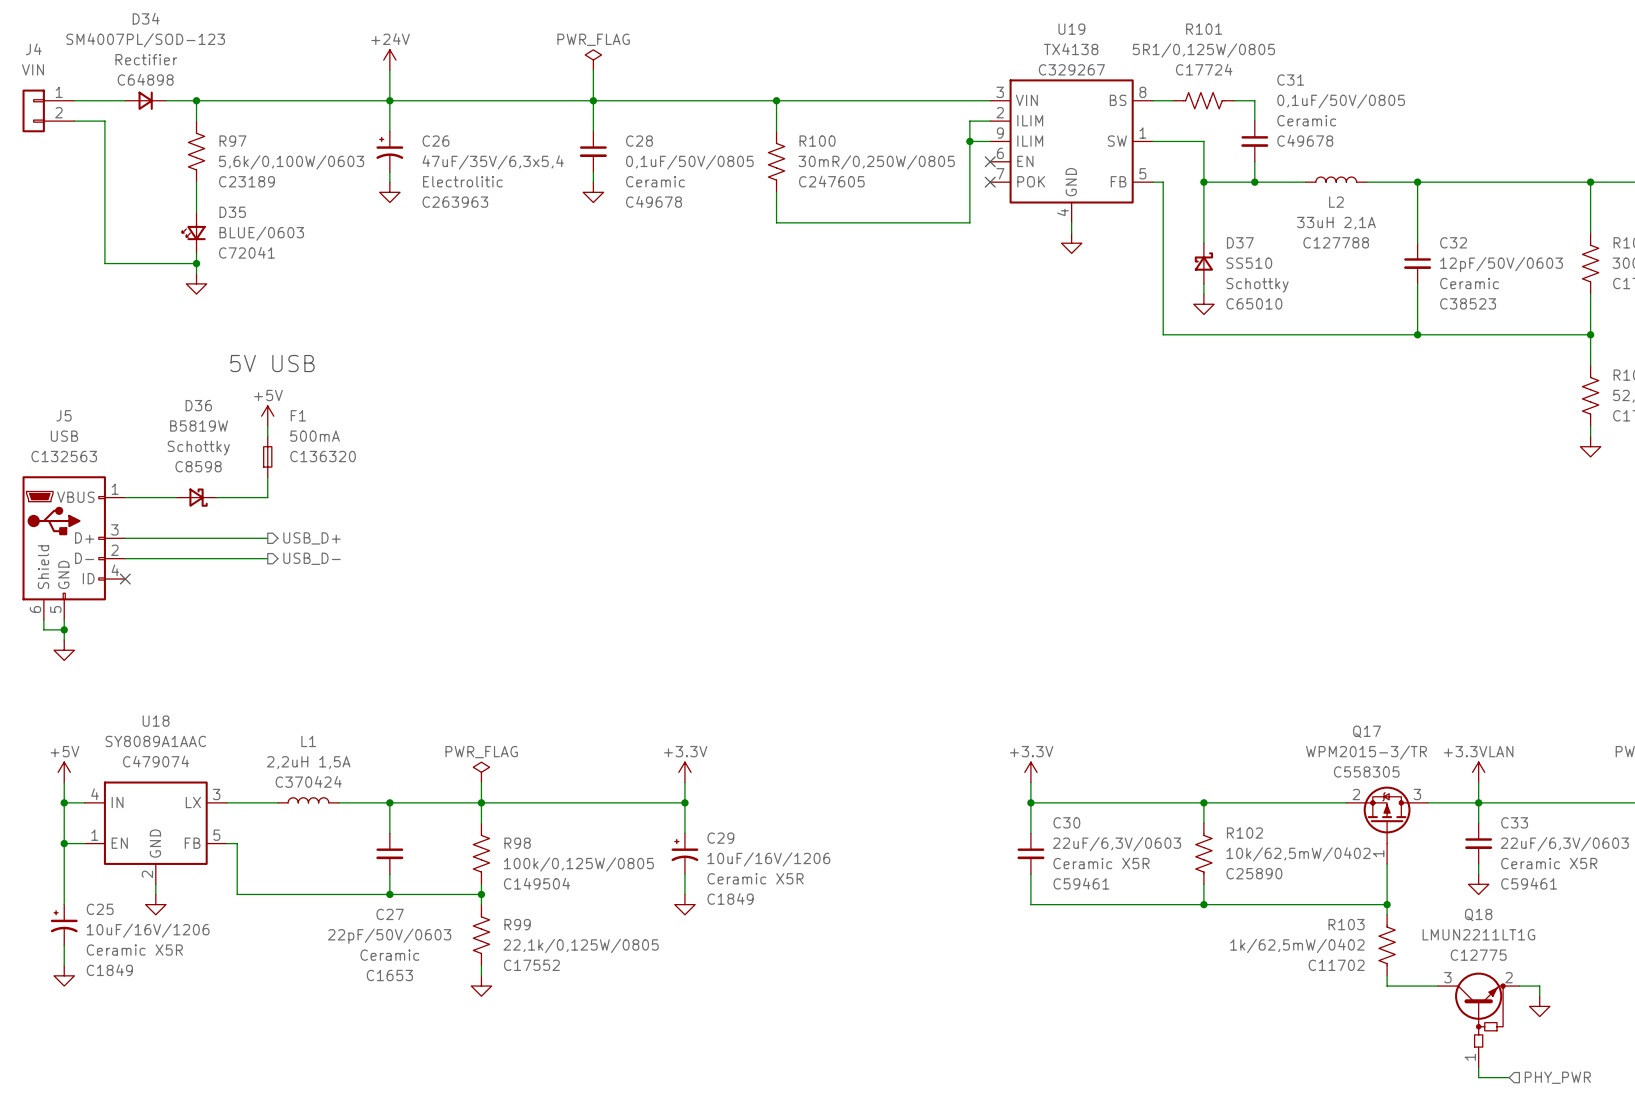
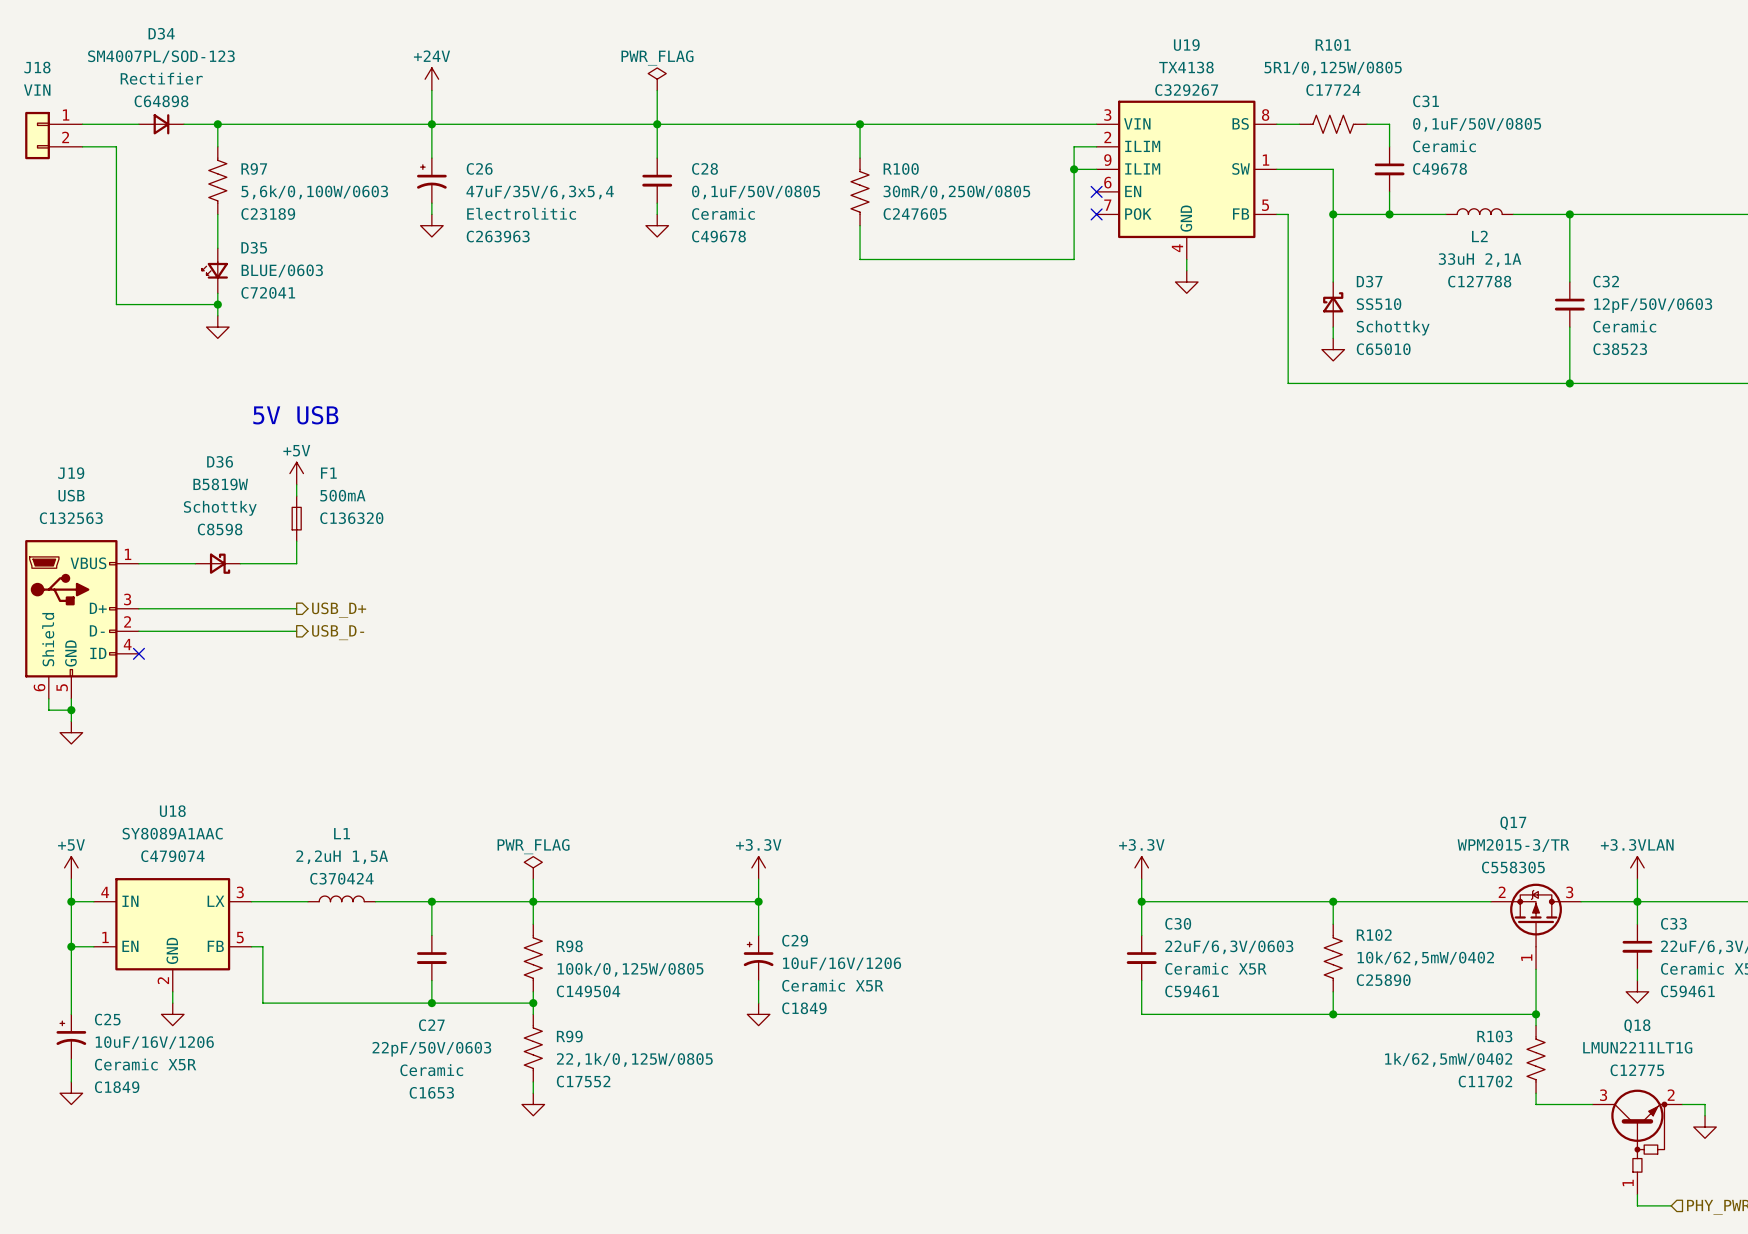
J4 name: J4 (33, 49) -> J18 (37, 67)
J5 name: J5 (63, 415) -> J19 (71, 473)

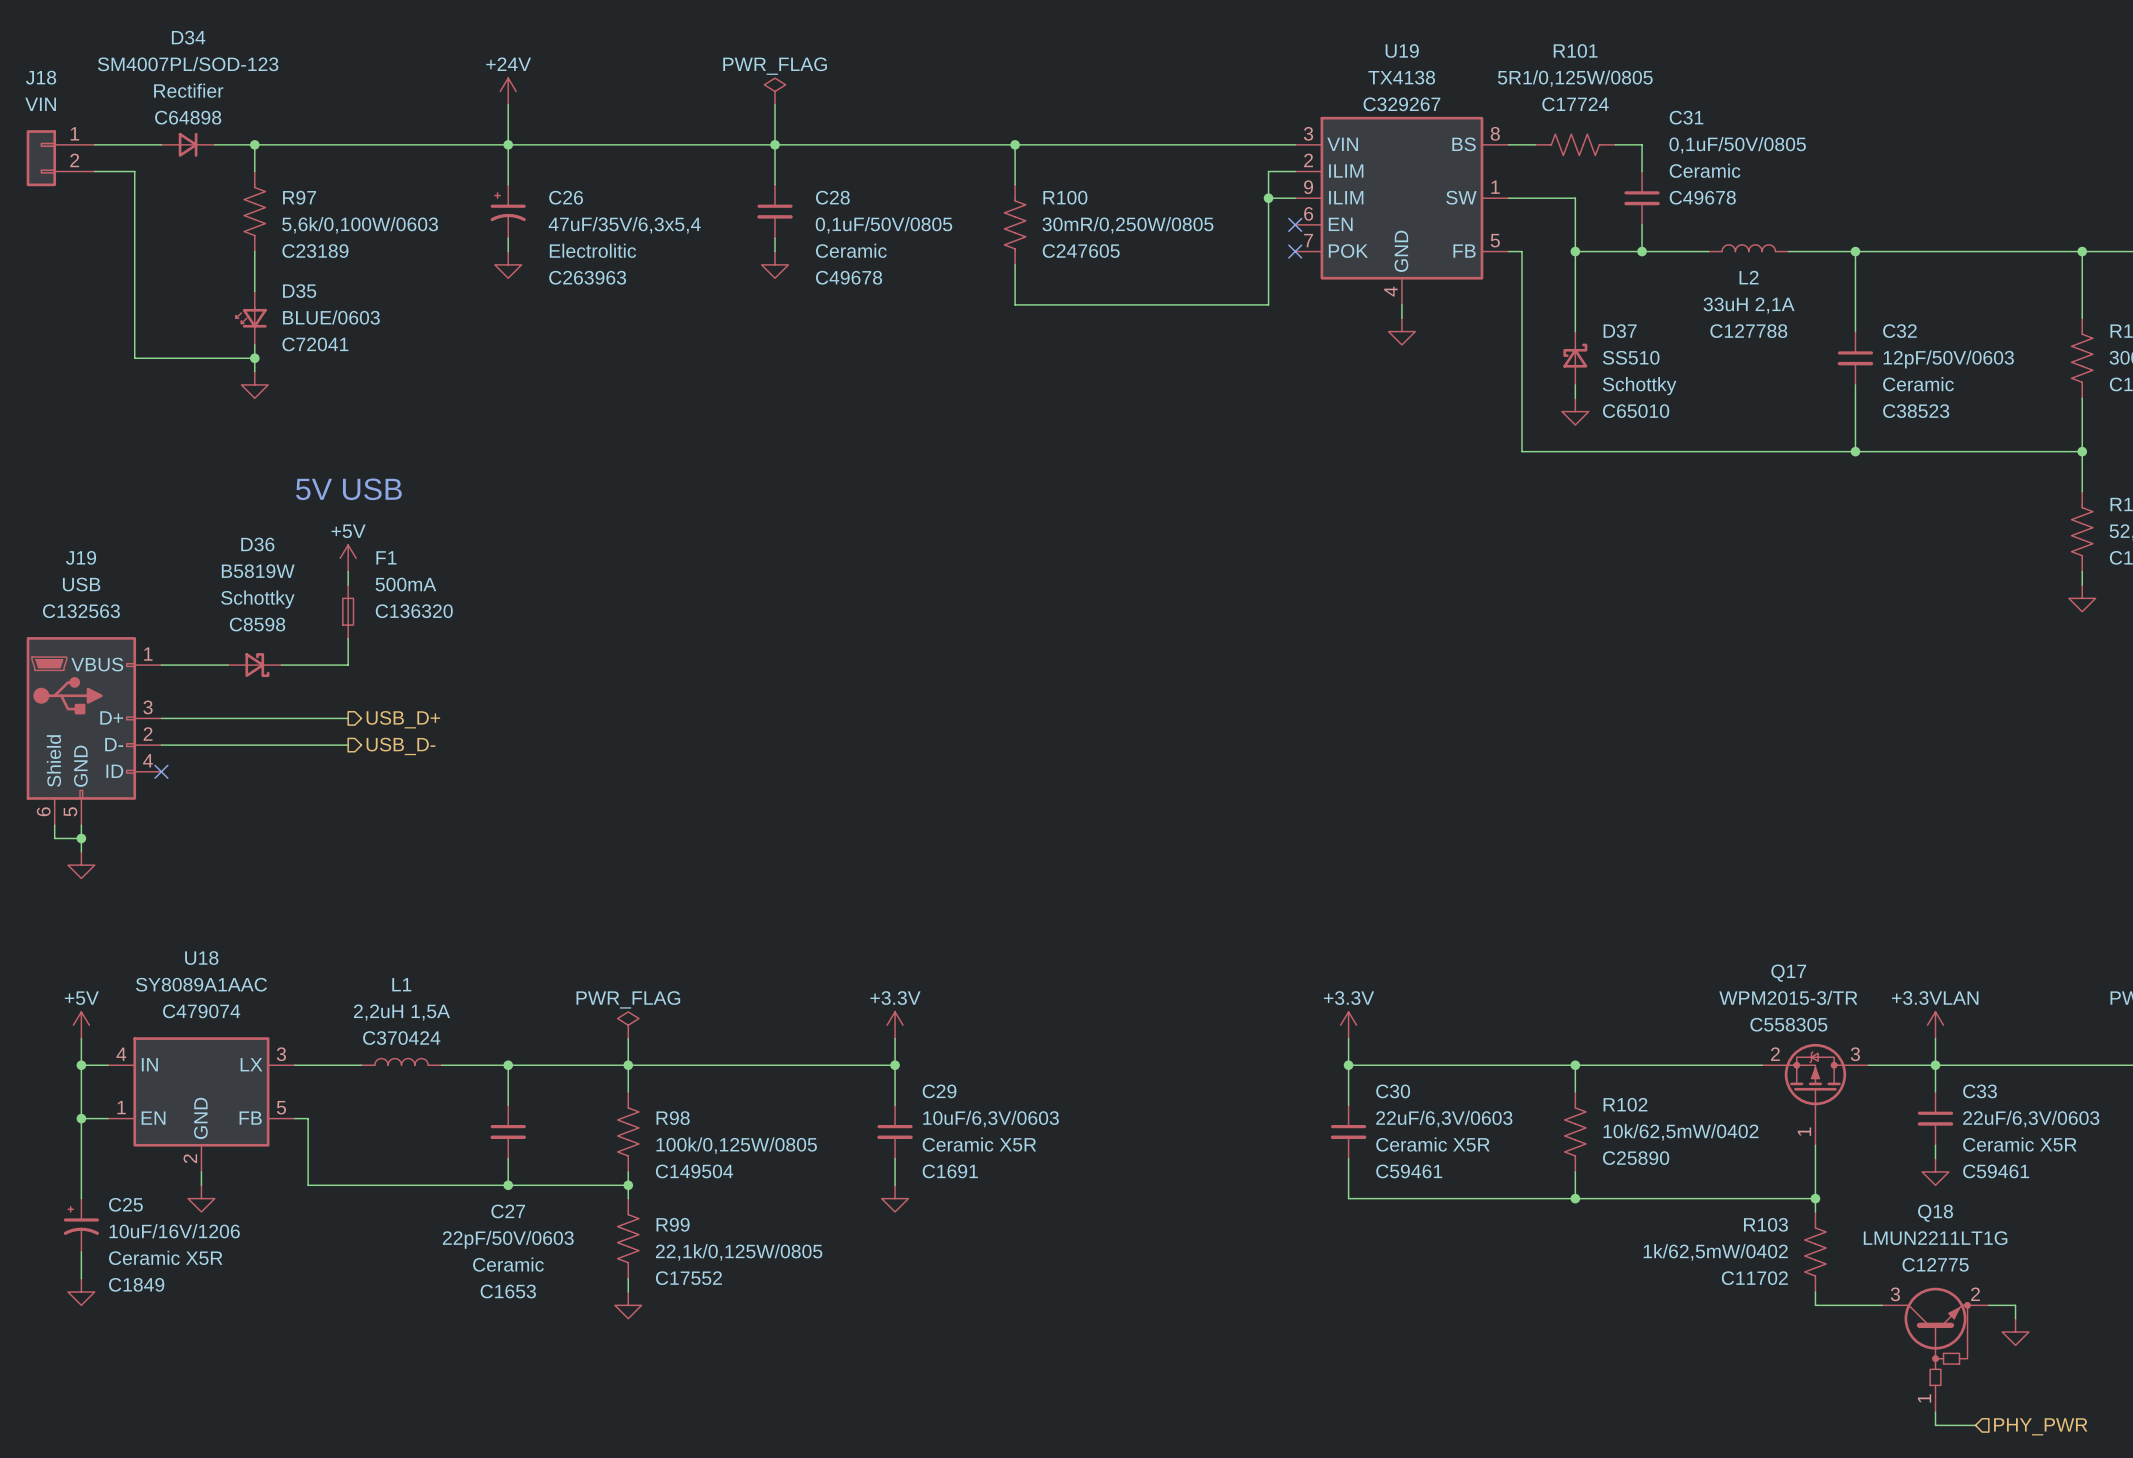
C29 symbol: [743, 935, 774, 981] -> [877, 1105, 913, 1159]
C29 value: 10uF/16V/1206 (842, 963) -> 10uF/6,3V/0603 (991, 1118)
C29 text: C1849 (804, 1008) -> C1691 (950, 1171)

